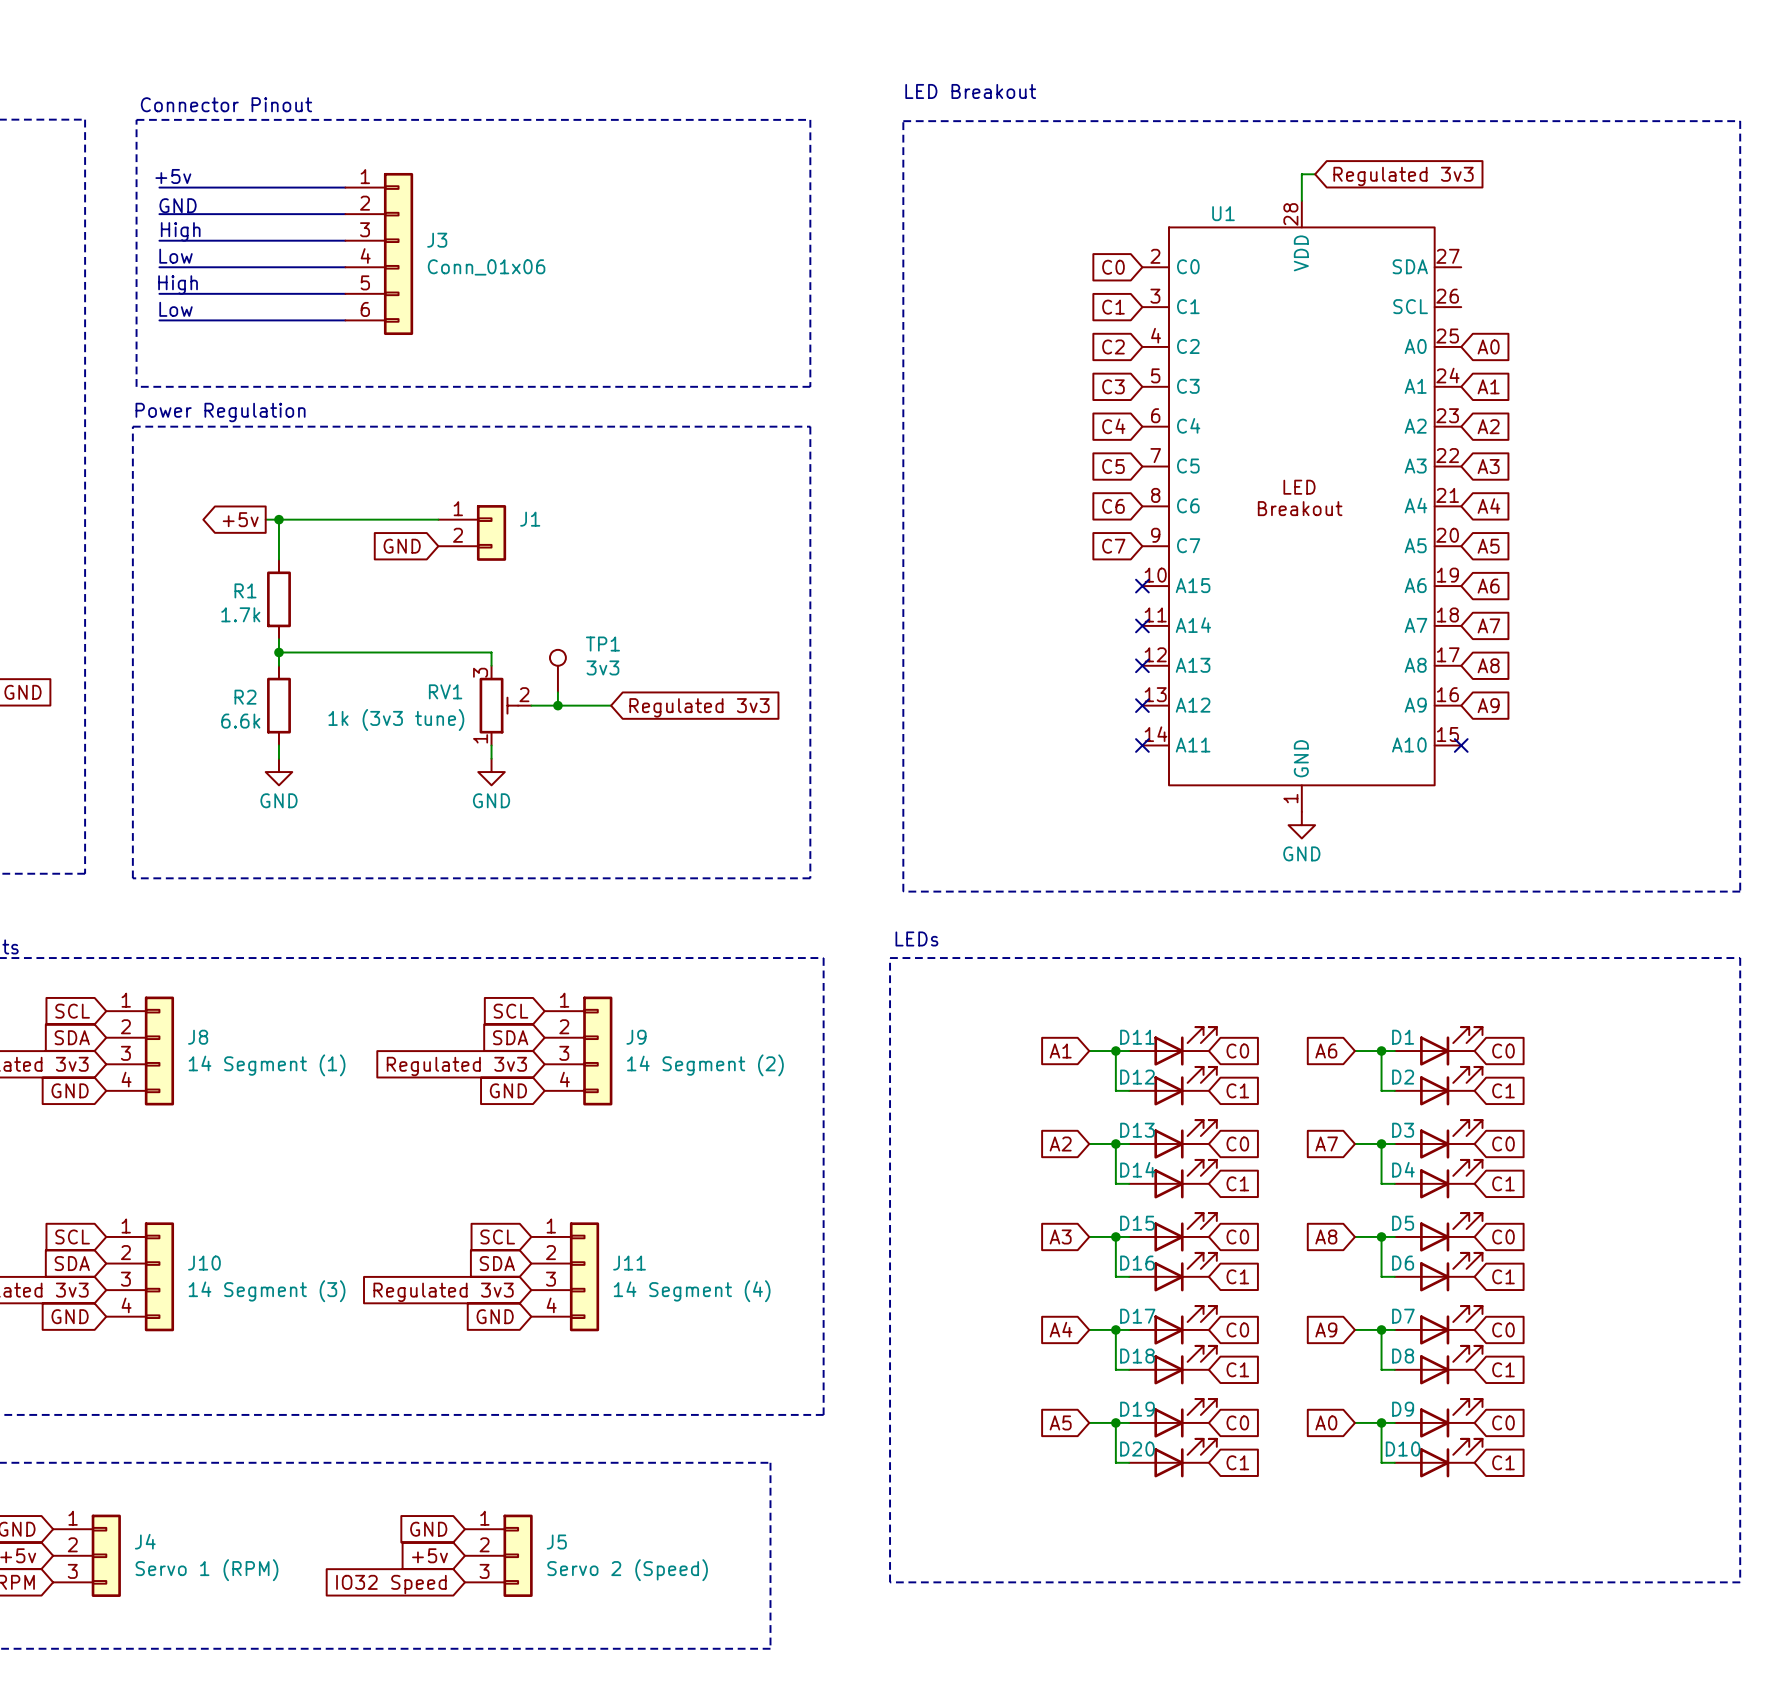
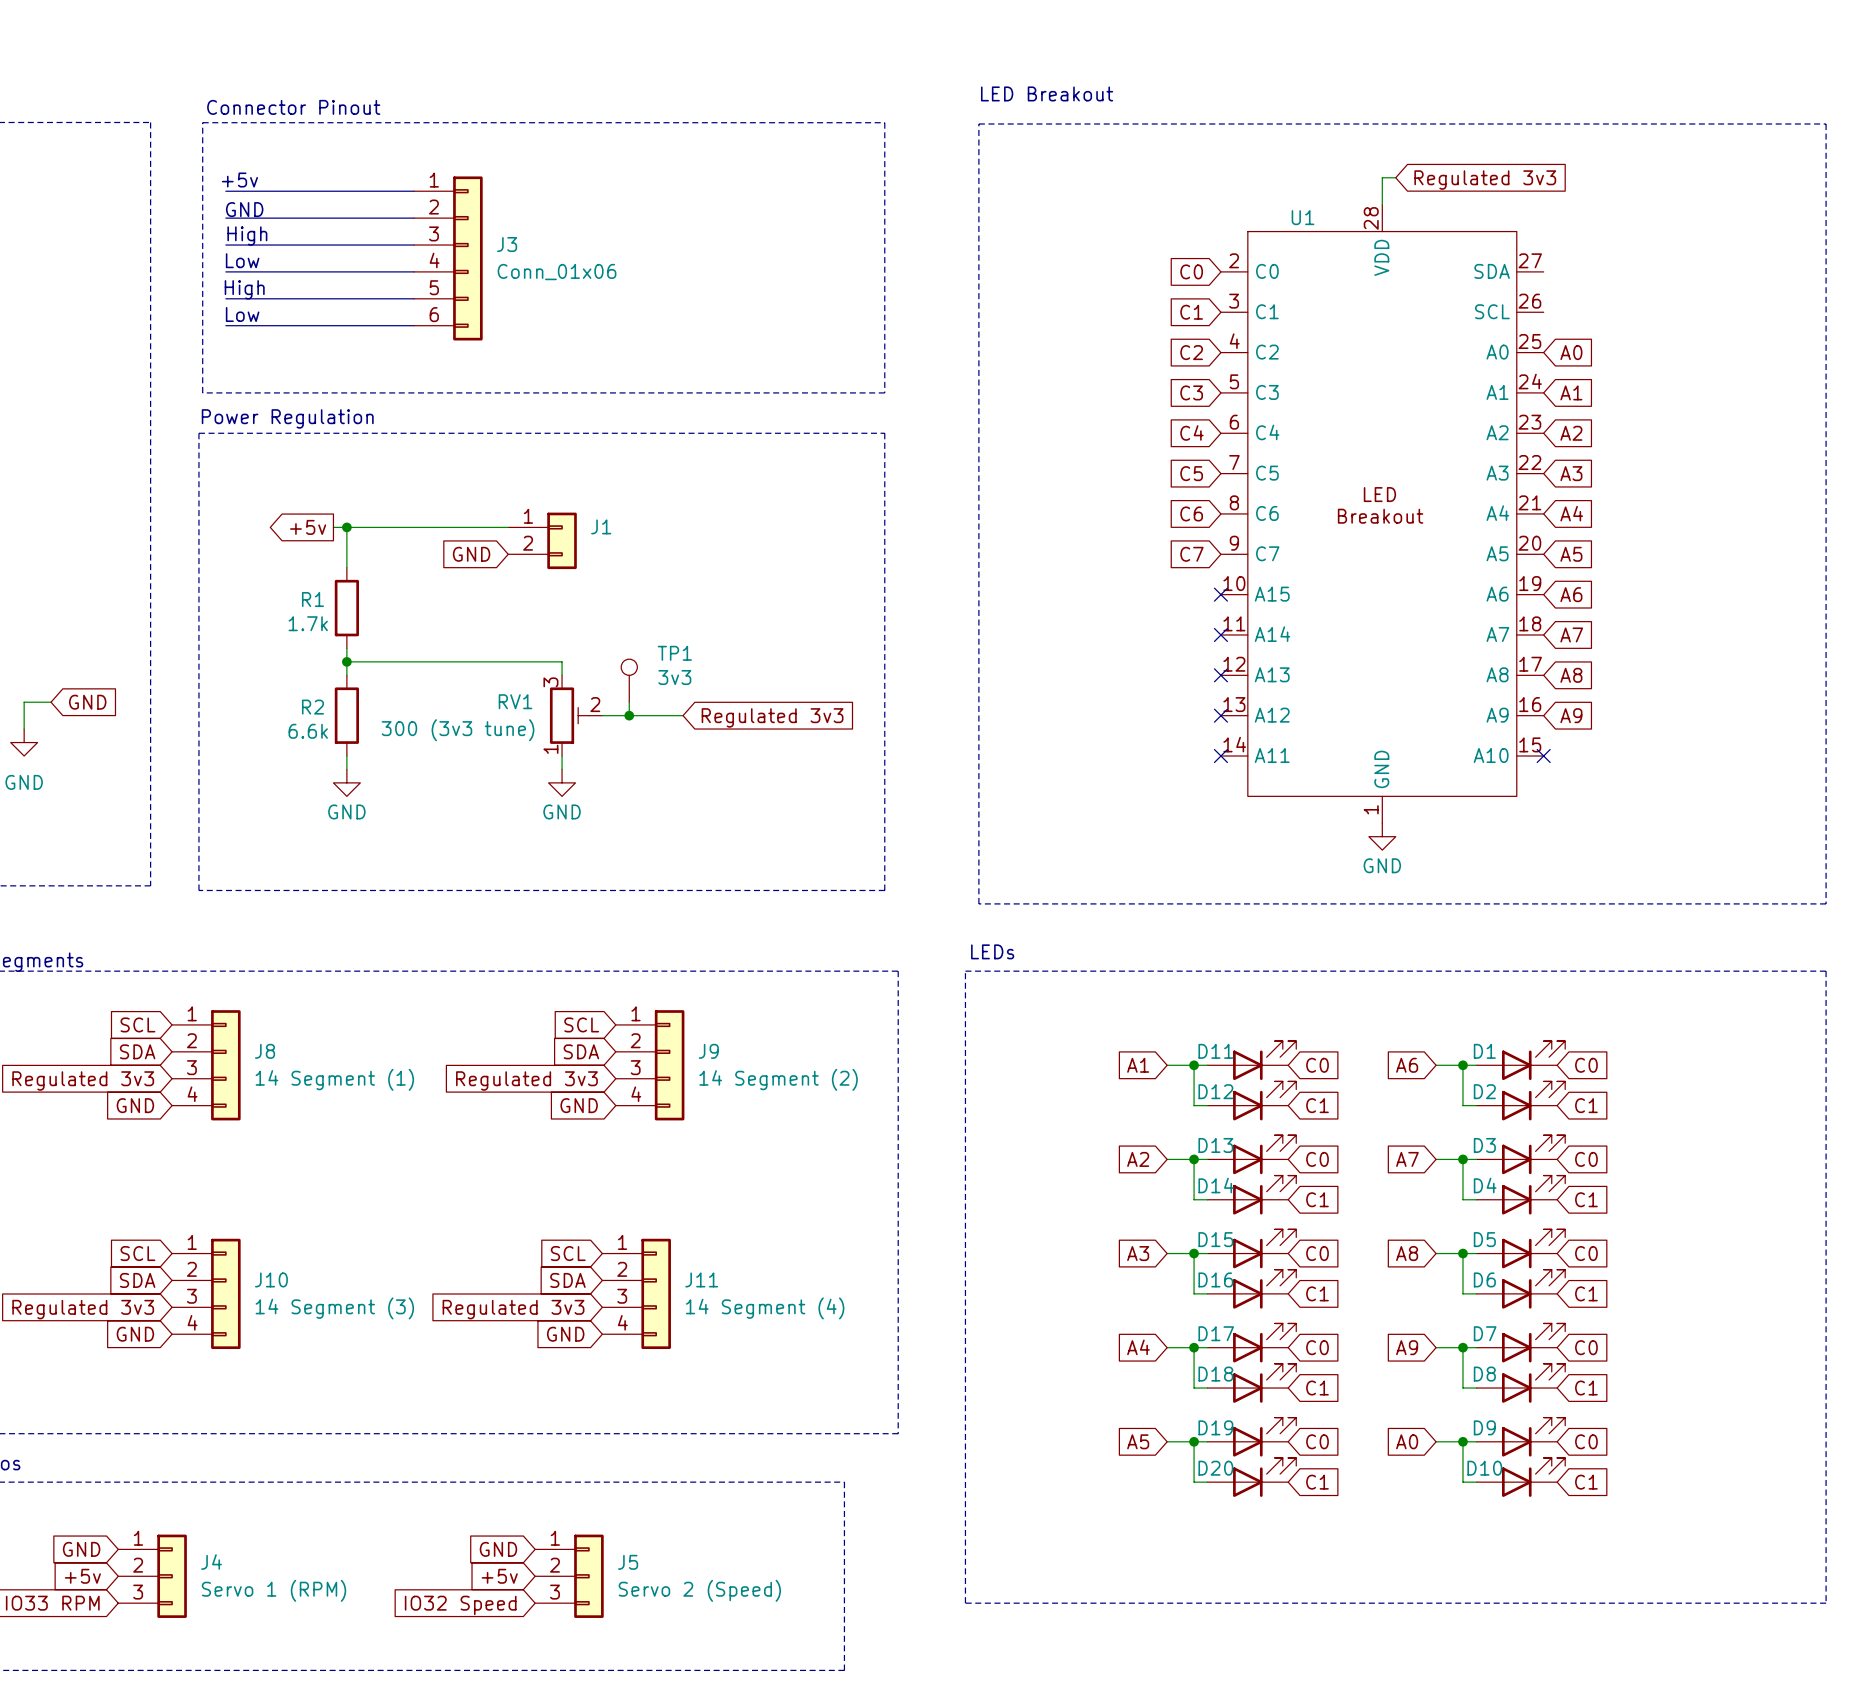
RV1 value: 1k (3v3 tune) (396, 720) -> 300 (3v3 tune) (458, 730)

